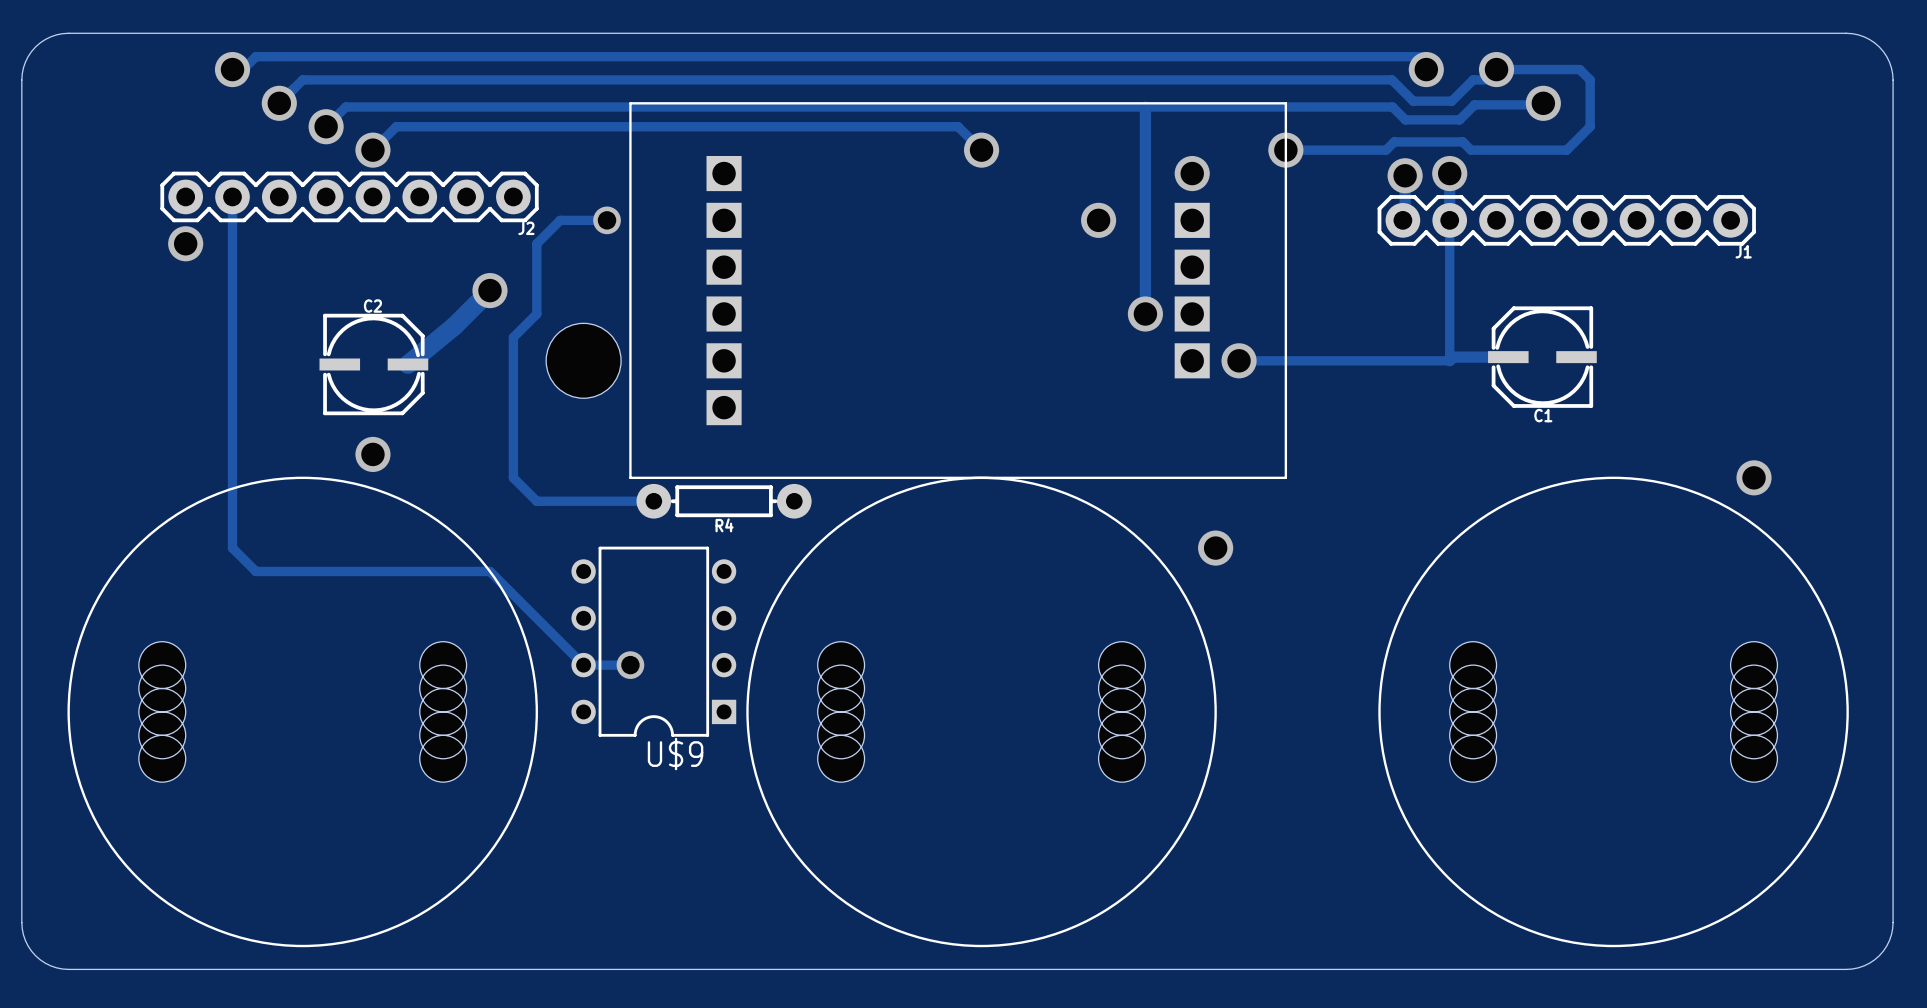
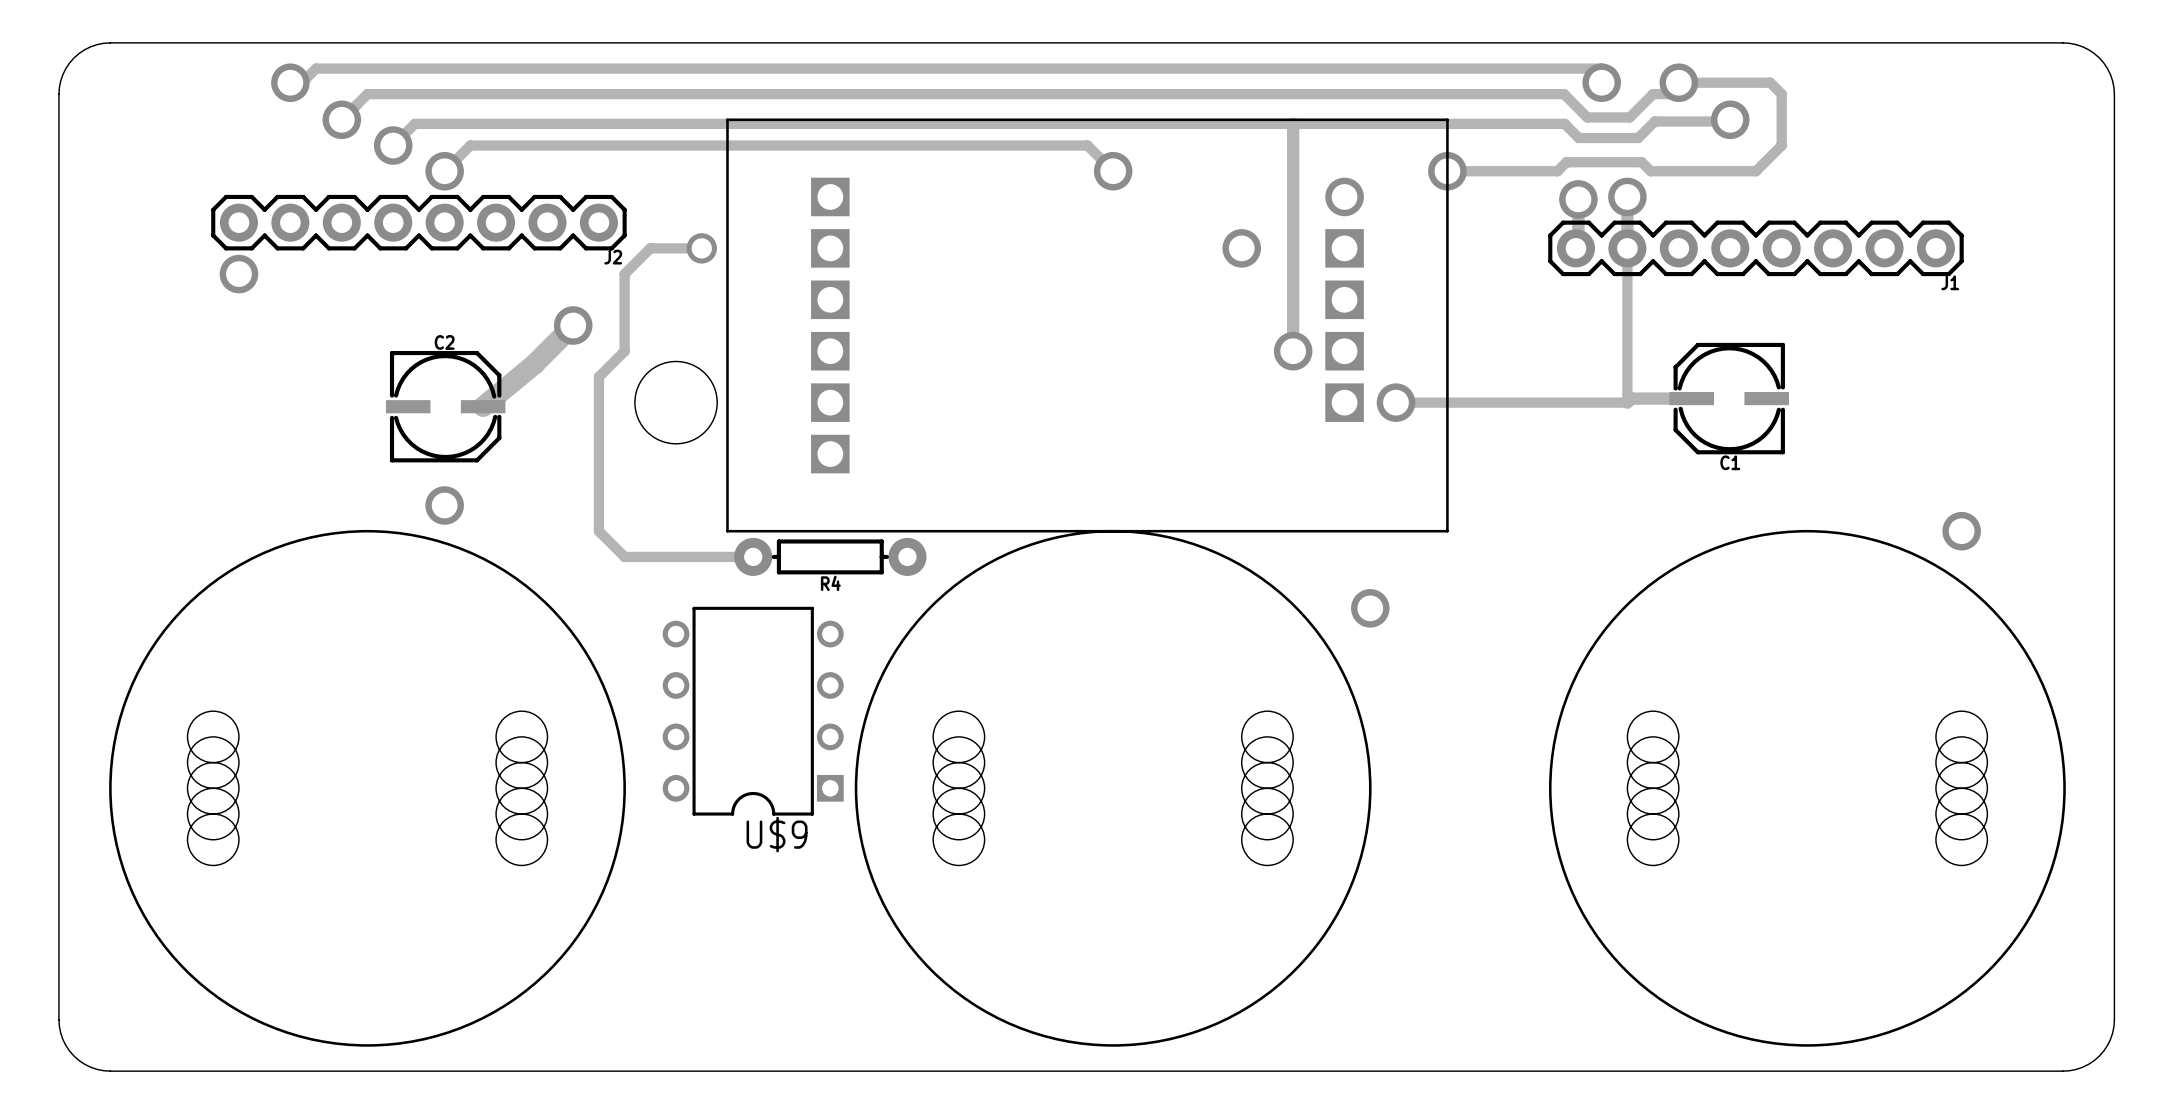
track: (232, 196) (232, 548) (255, 571) (489, 571) (583, 665) (630, 665) -> none
via: (630, 665) -> none

